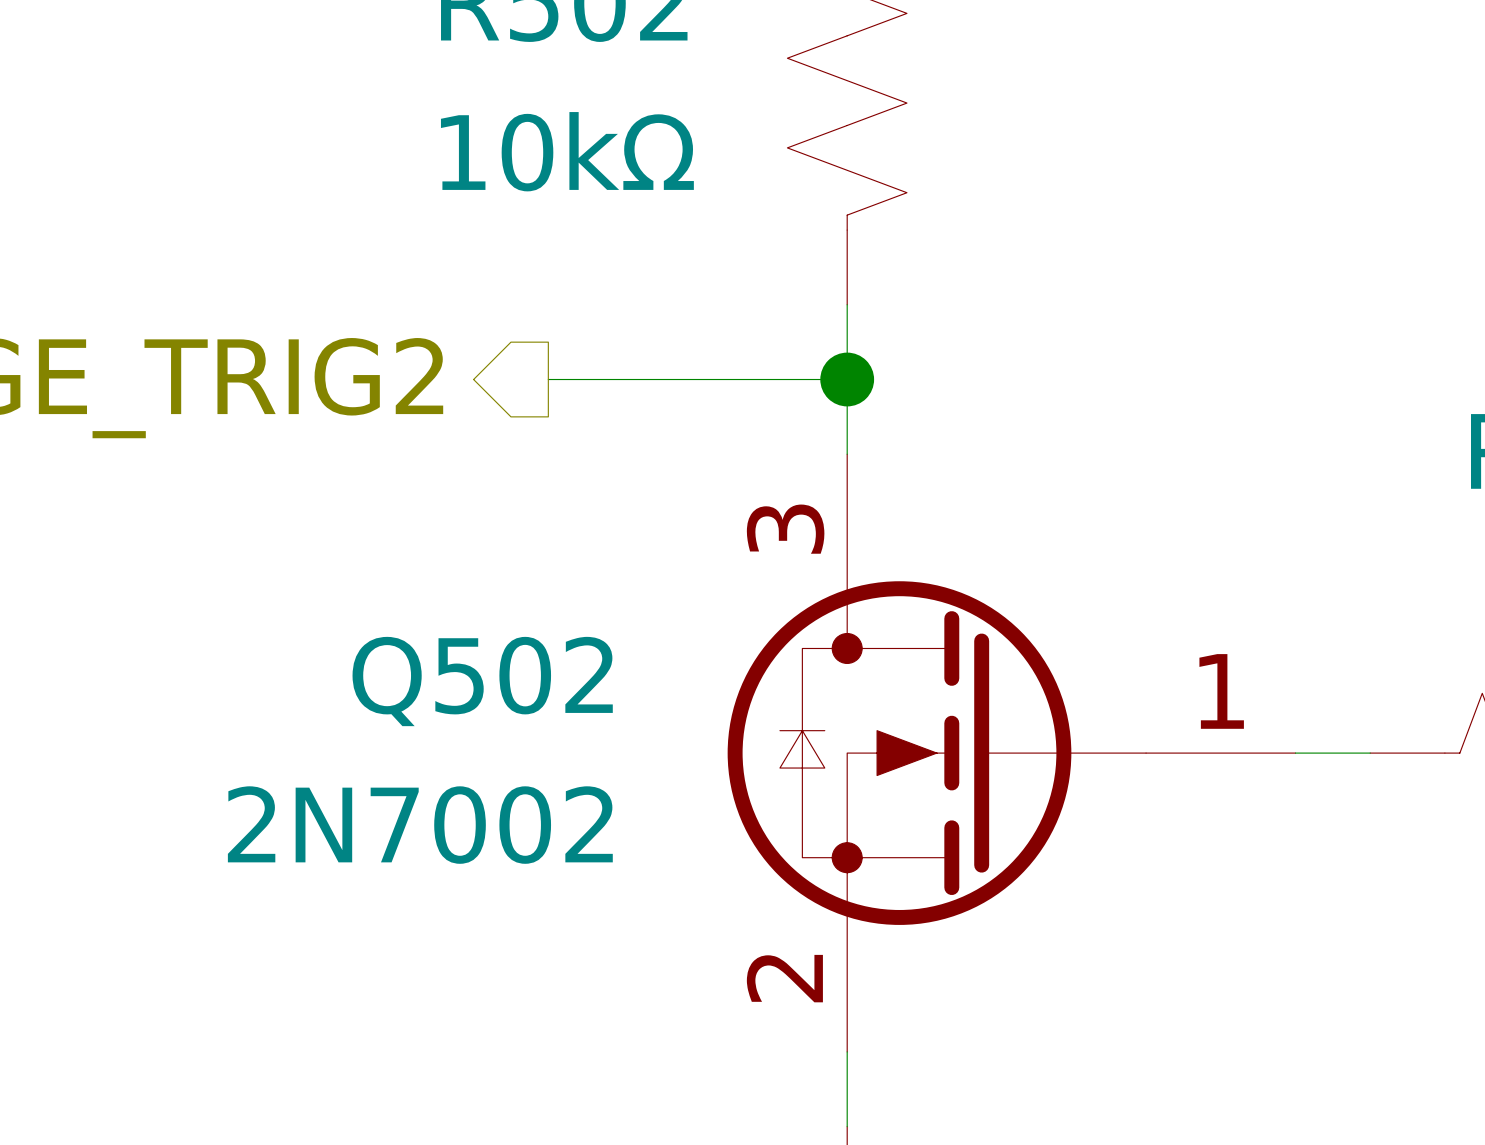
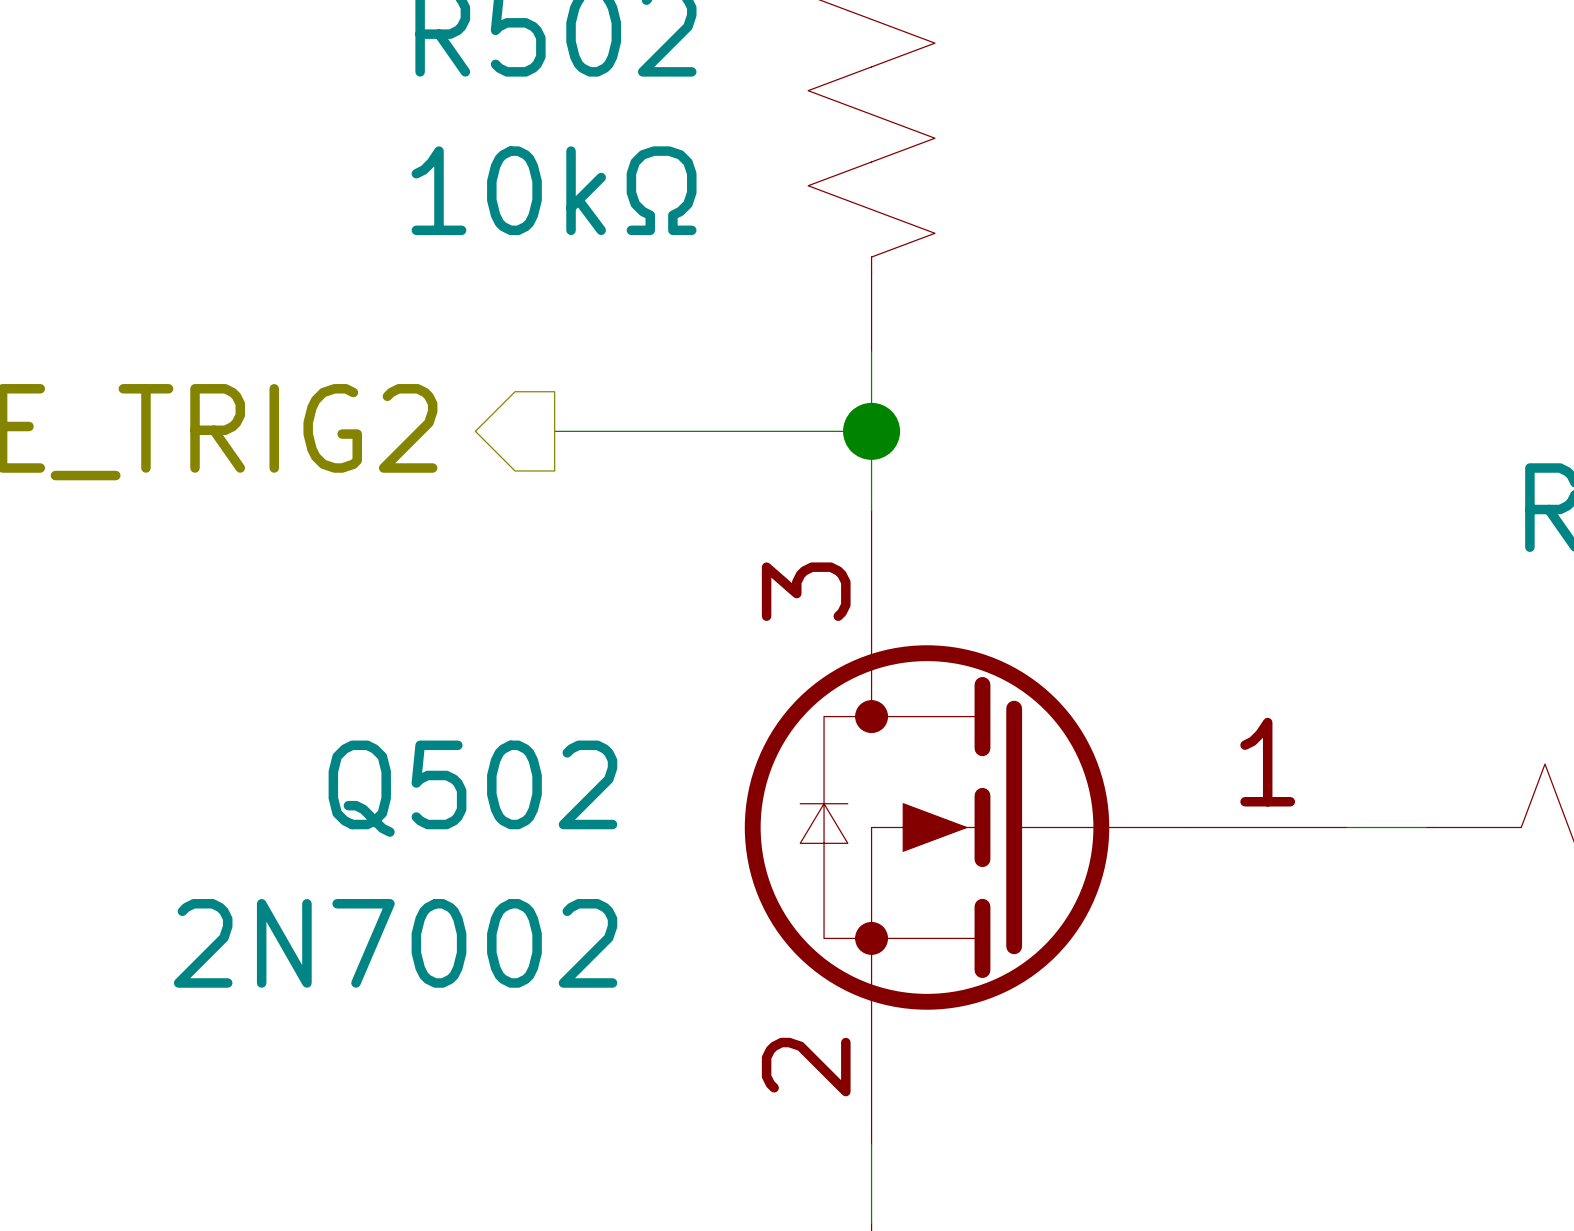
Q502 name position: Q502 (482, 681) -> Q502 (472, 788)
Q502 value position: 2N7002 (420, 825) -> 2N7002 (395, 943)

